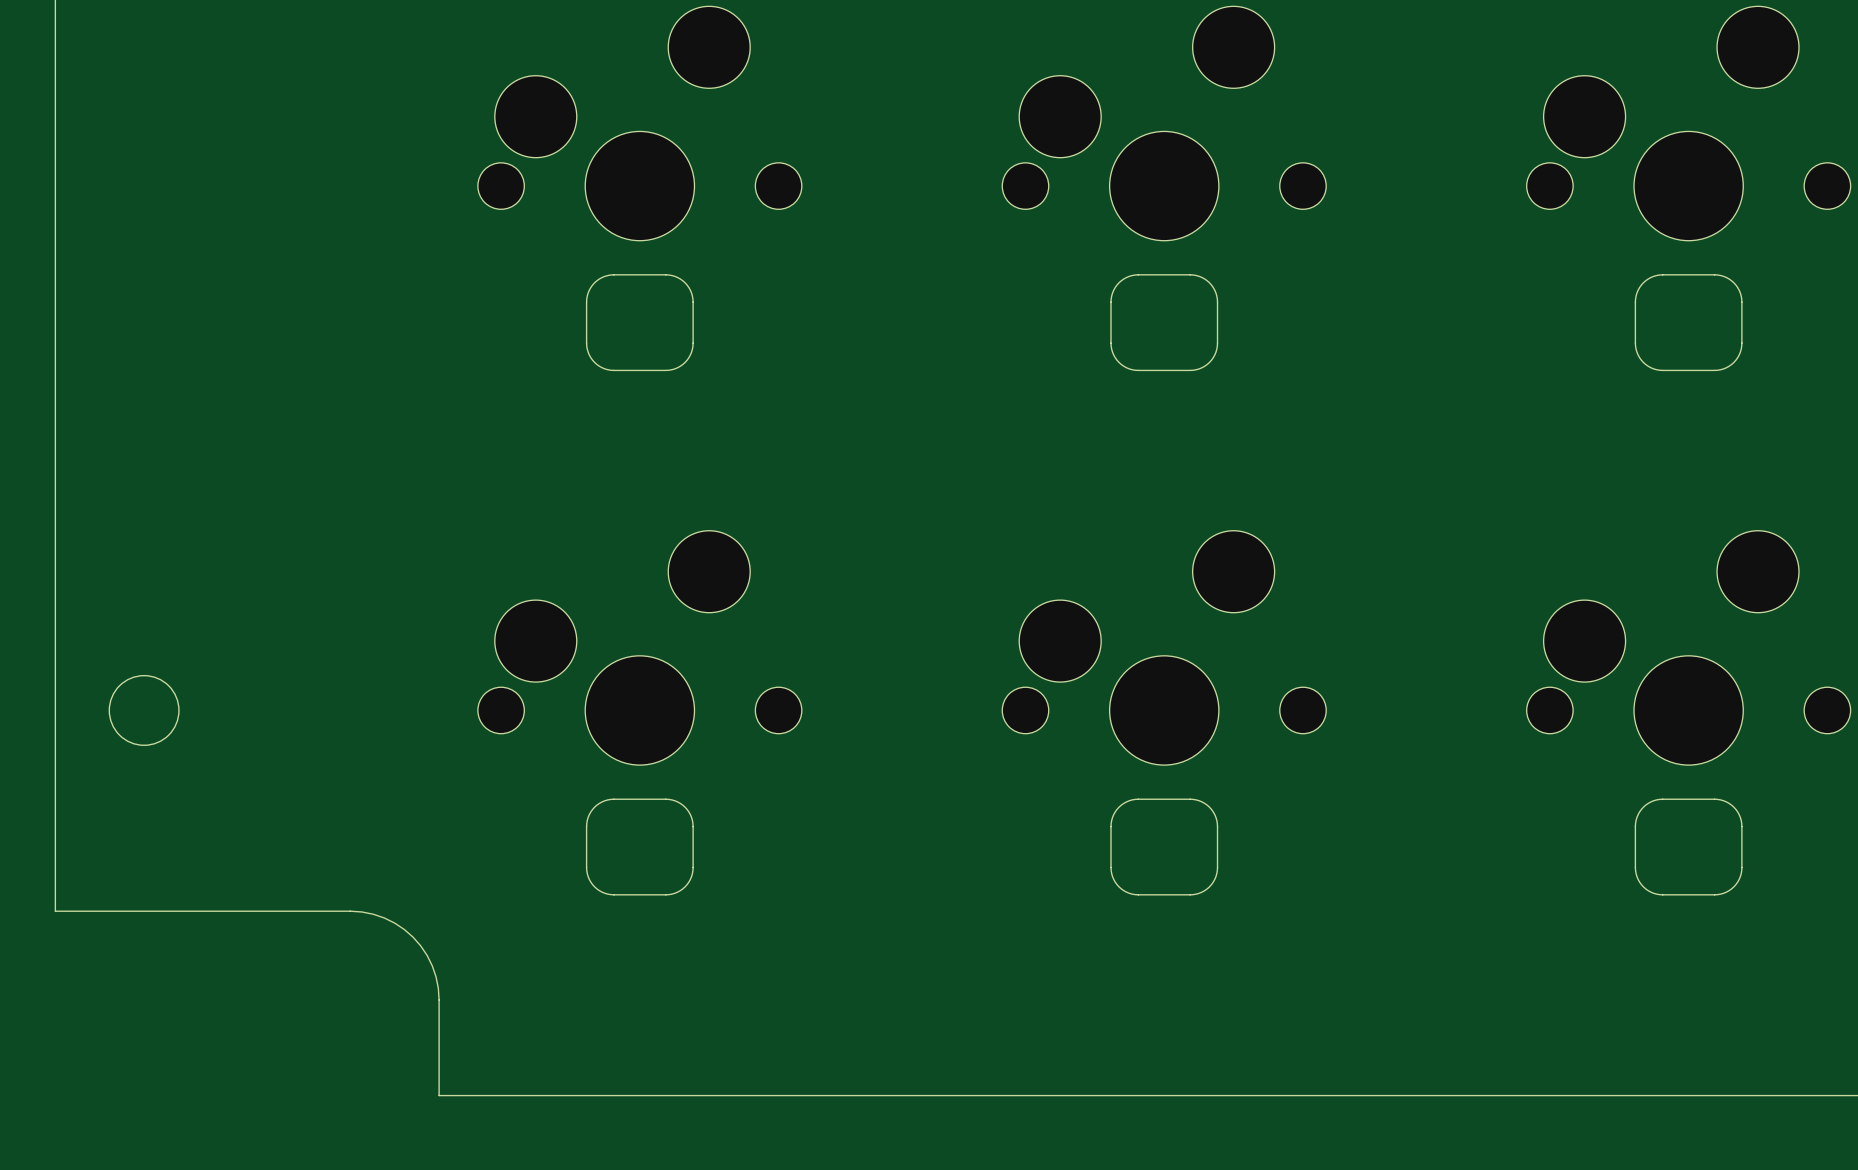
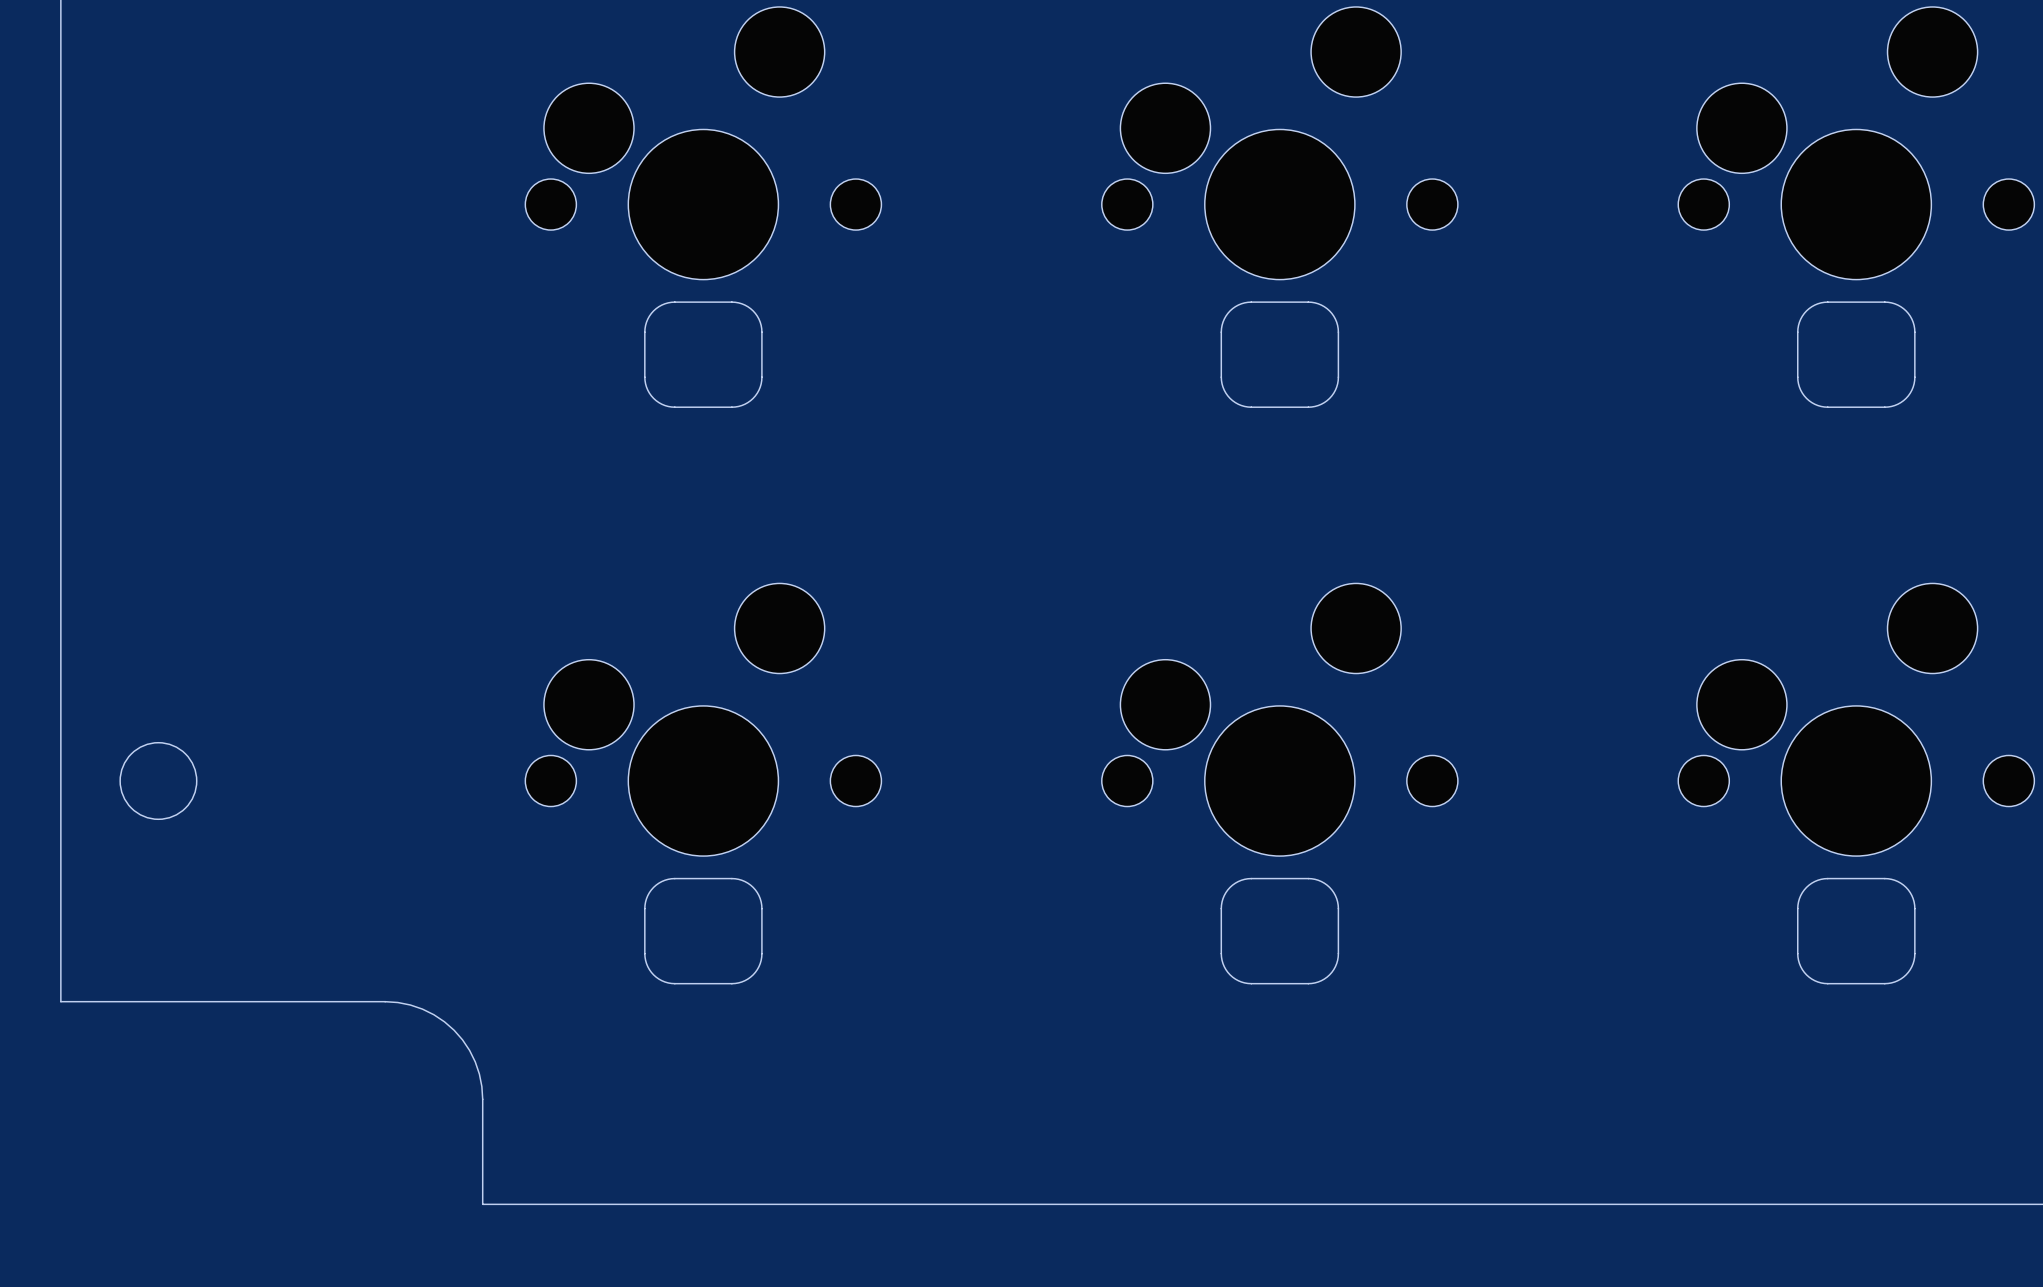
part footprint: [477, 6, 802, 241] -> [525, 6, 882, 280]
part footprint: [1002, 6, 1327, 241] -> [1101, 6, 1458, 280]
part footprint: [1526, 6, 1851, 241] -> [1678, 6, 2035, 280]
part footprint: [477, 530, 802, 766] -> [525, 583, 882, 857]
part footprint: [1002, 530, 1327, 766] -> [1101, 583, 1458, 857]
part footprint: [1526, 530, 1851, 766] -> [1678, 583, 2035, 857]

